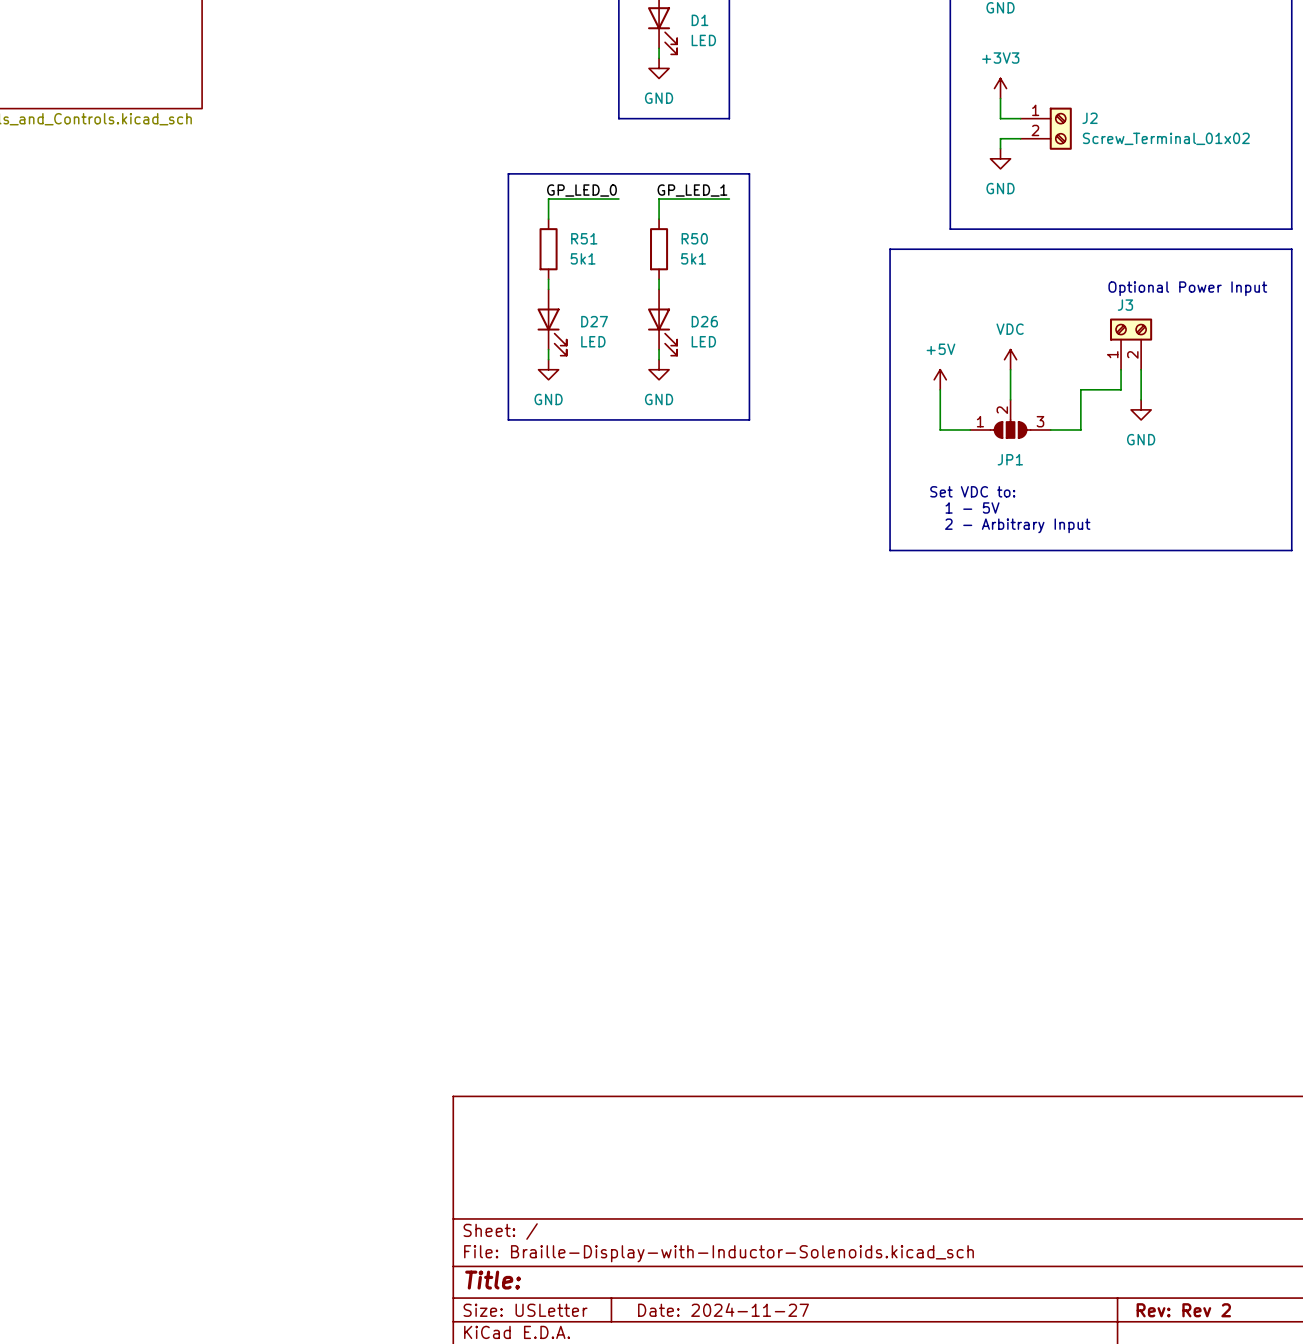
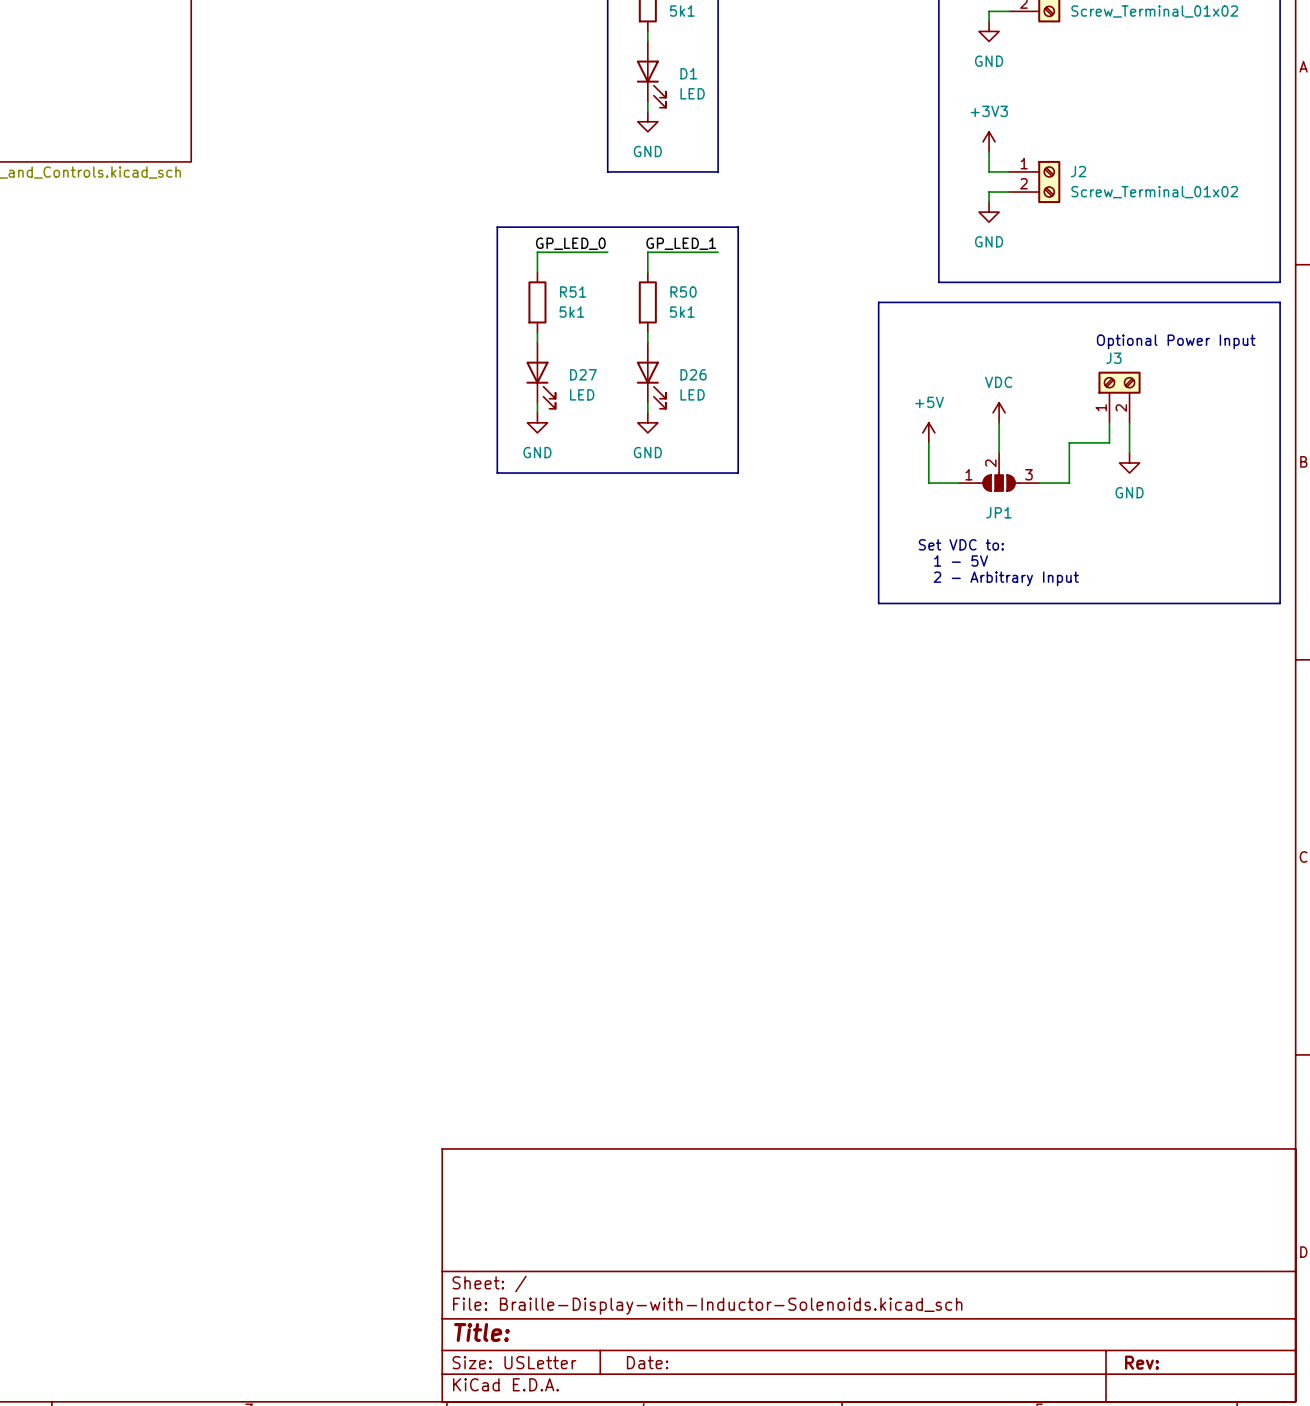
title block: Date: 2024-11-27 (723, 1309) -> Date: (647, 1362)
title block: Rev: Rev 2 (1183, 1310) -> Rev: (1141, 1362)

